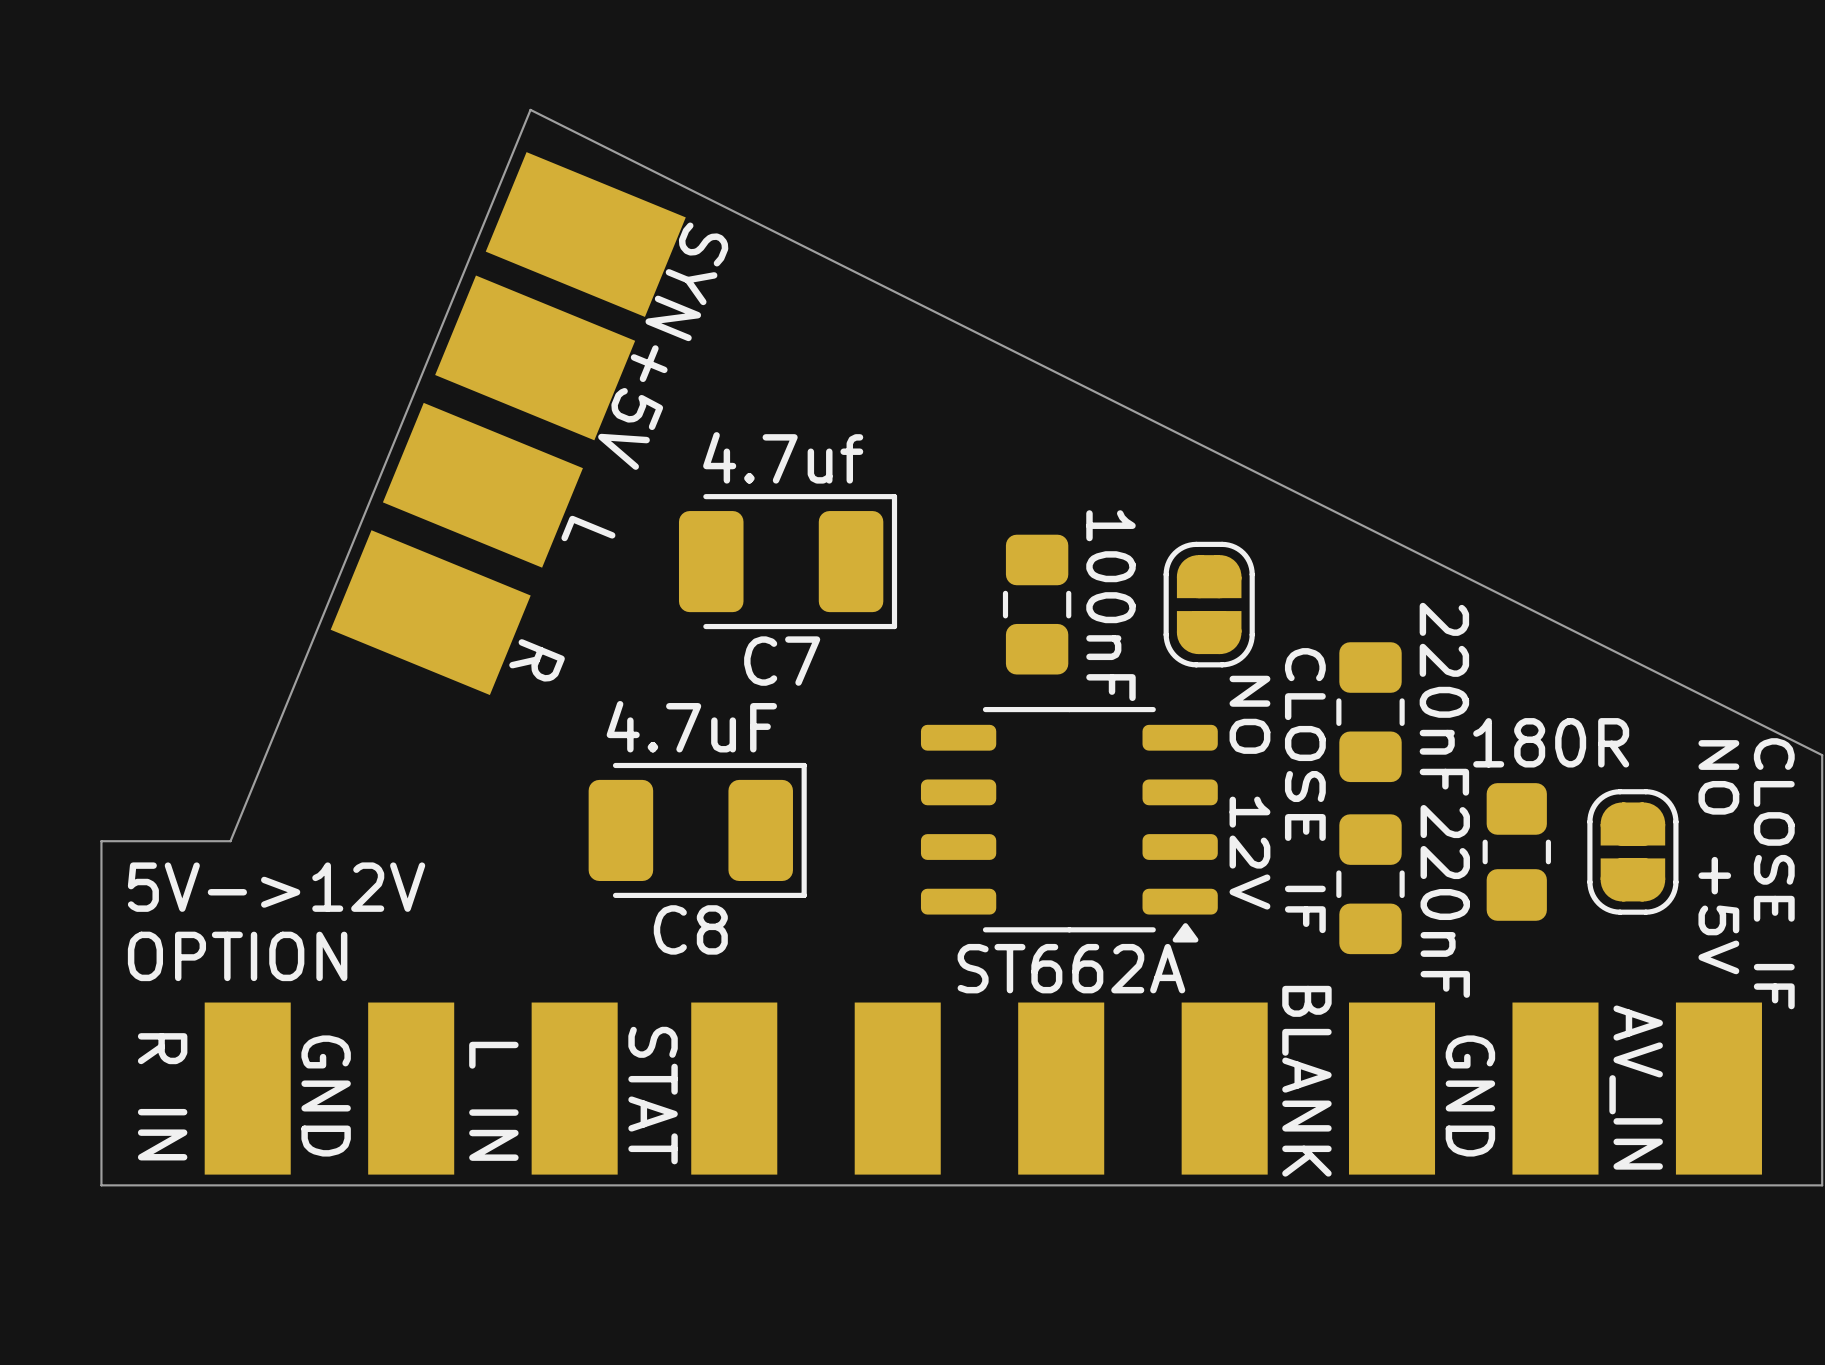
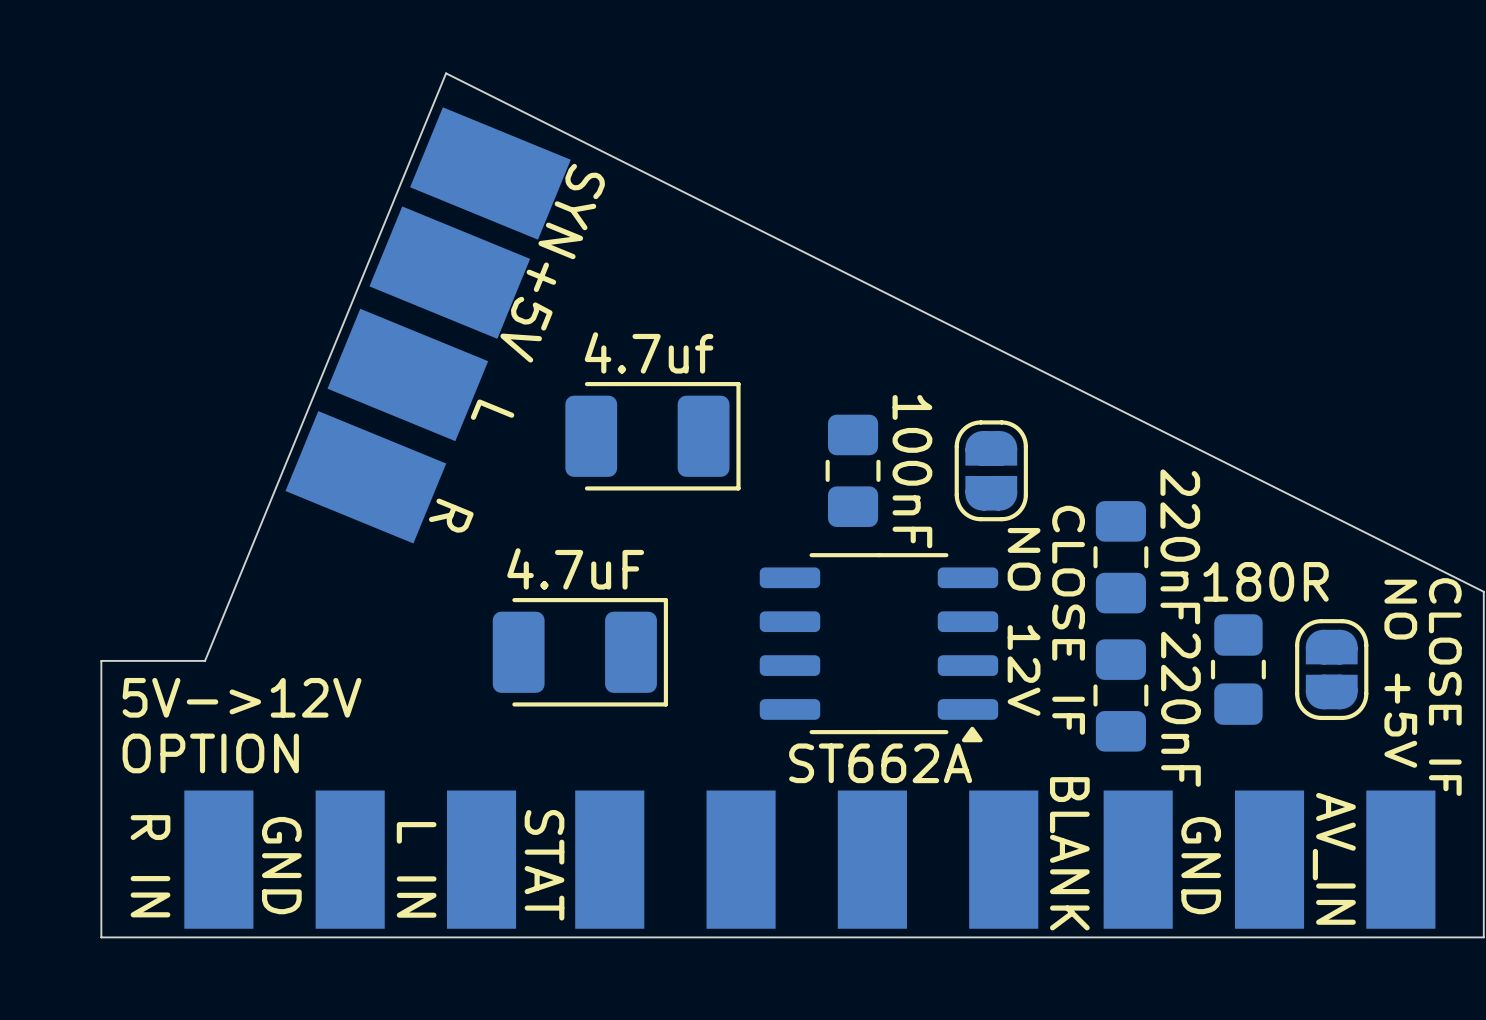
C7 name: C7 (782, 661) -> none
C8 name: C8 (690, 929) -> none

